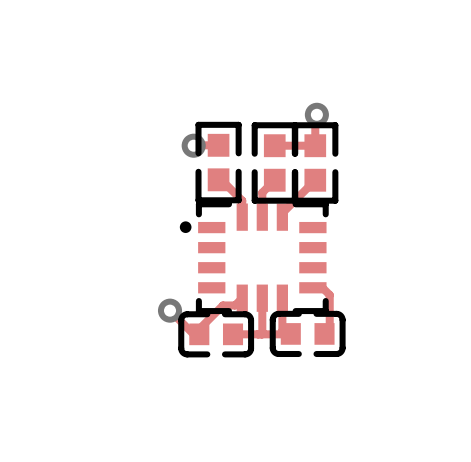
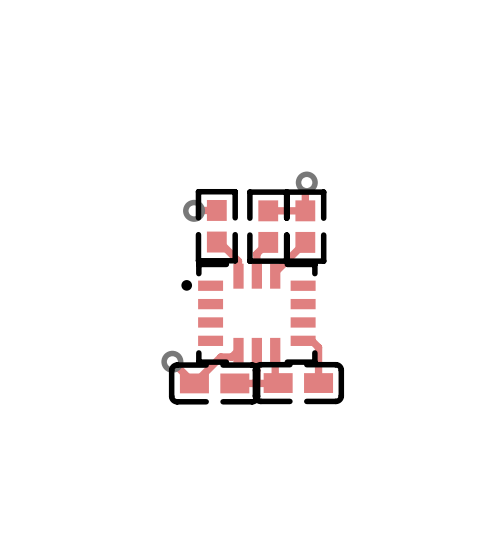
part footprint: [269, 310, 346, 358] -> [252, 361, 345, 405]
part footprint: [178, 311, 255, 358] -> [168, 362, 261, 405]

